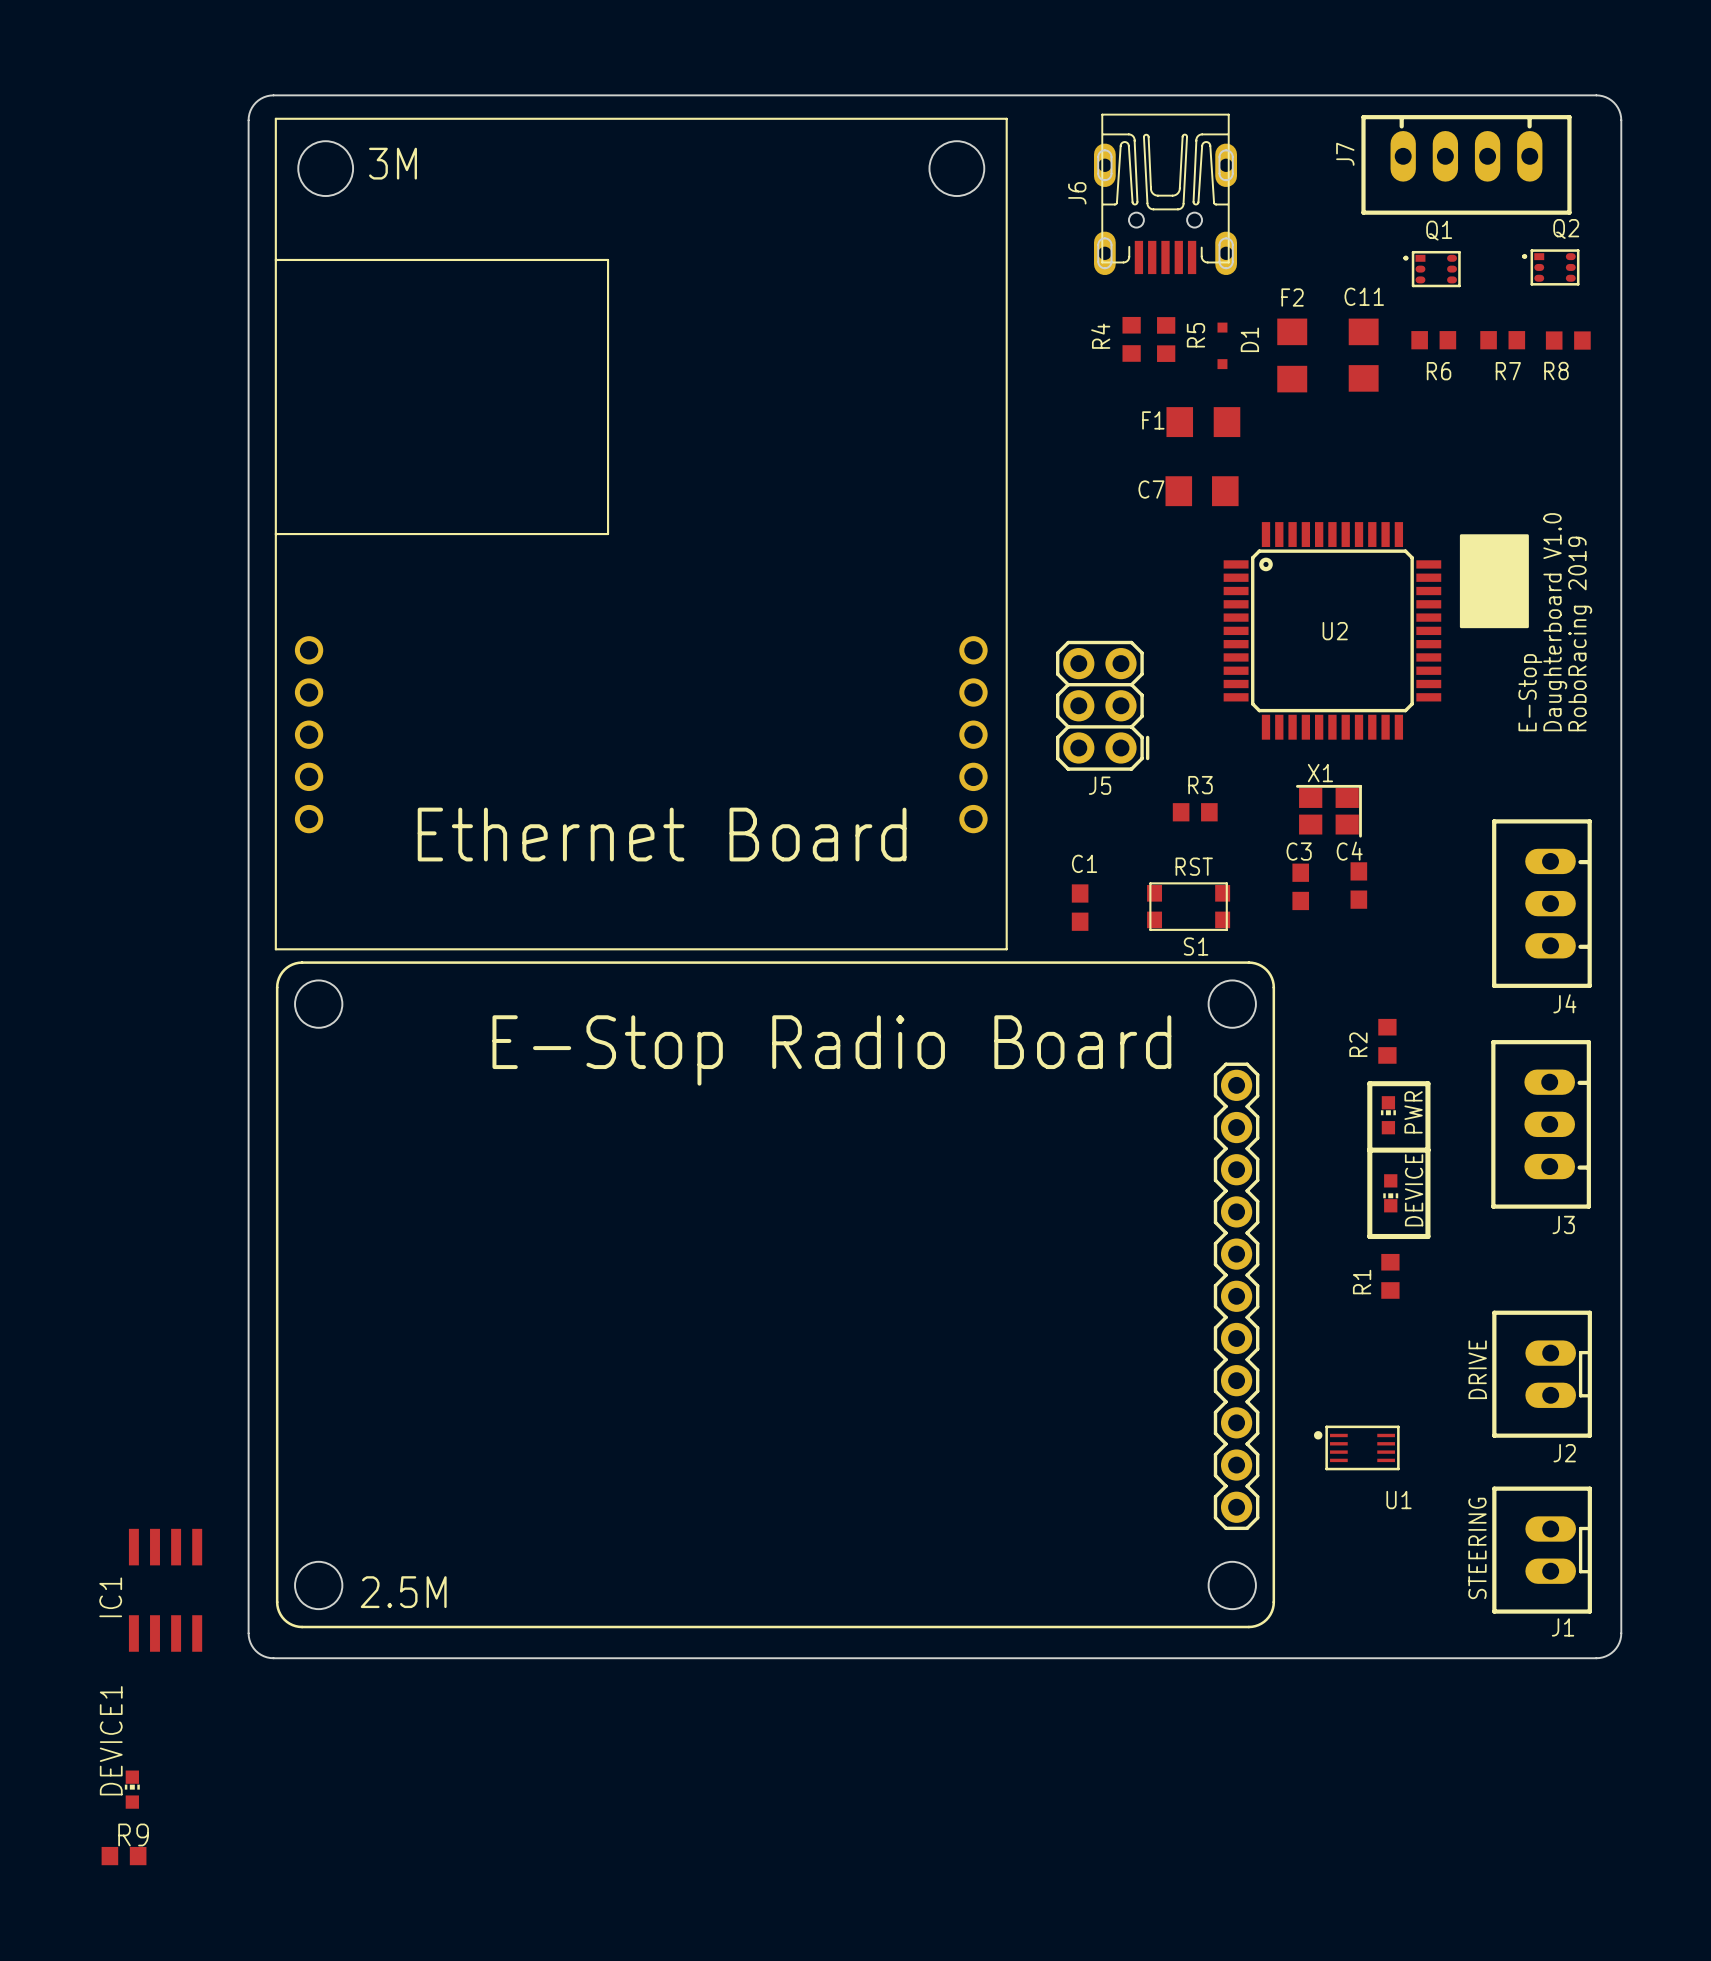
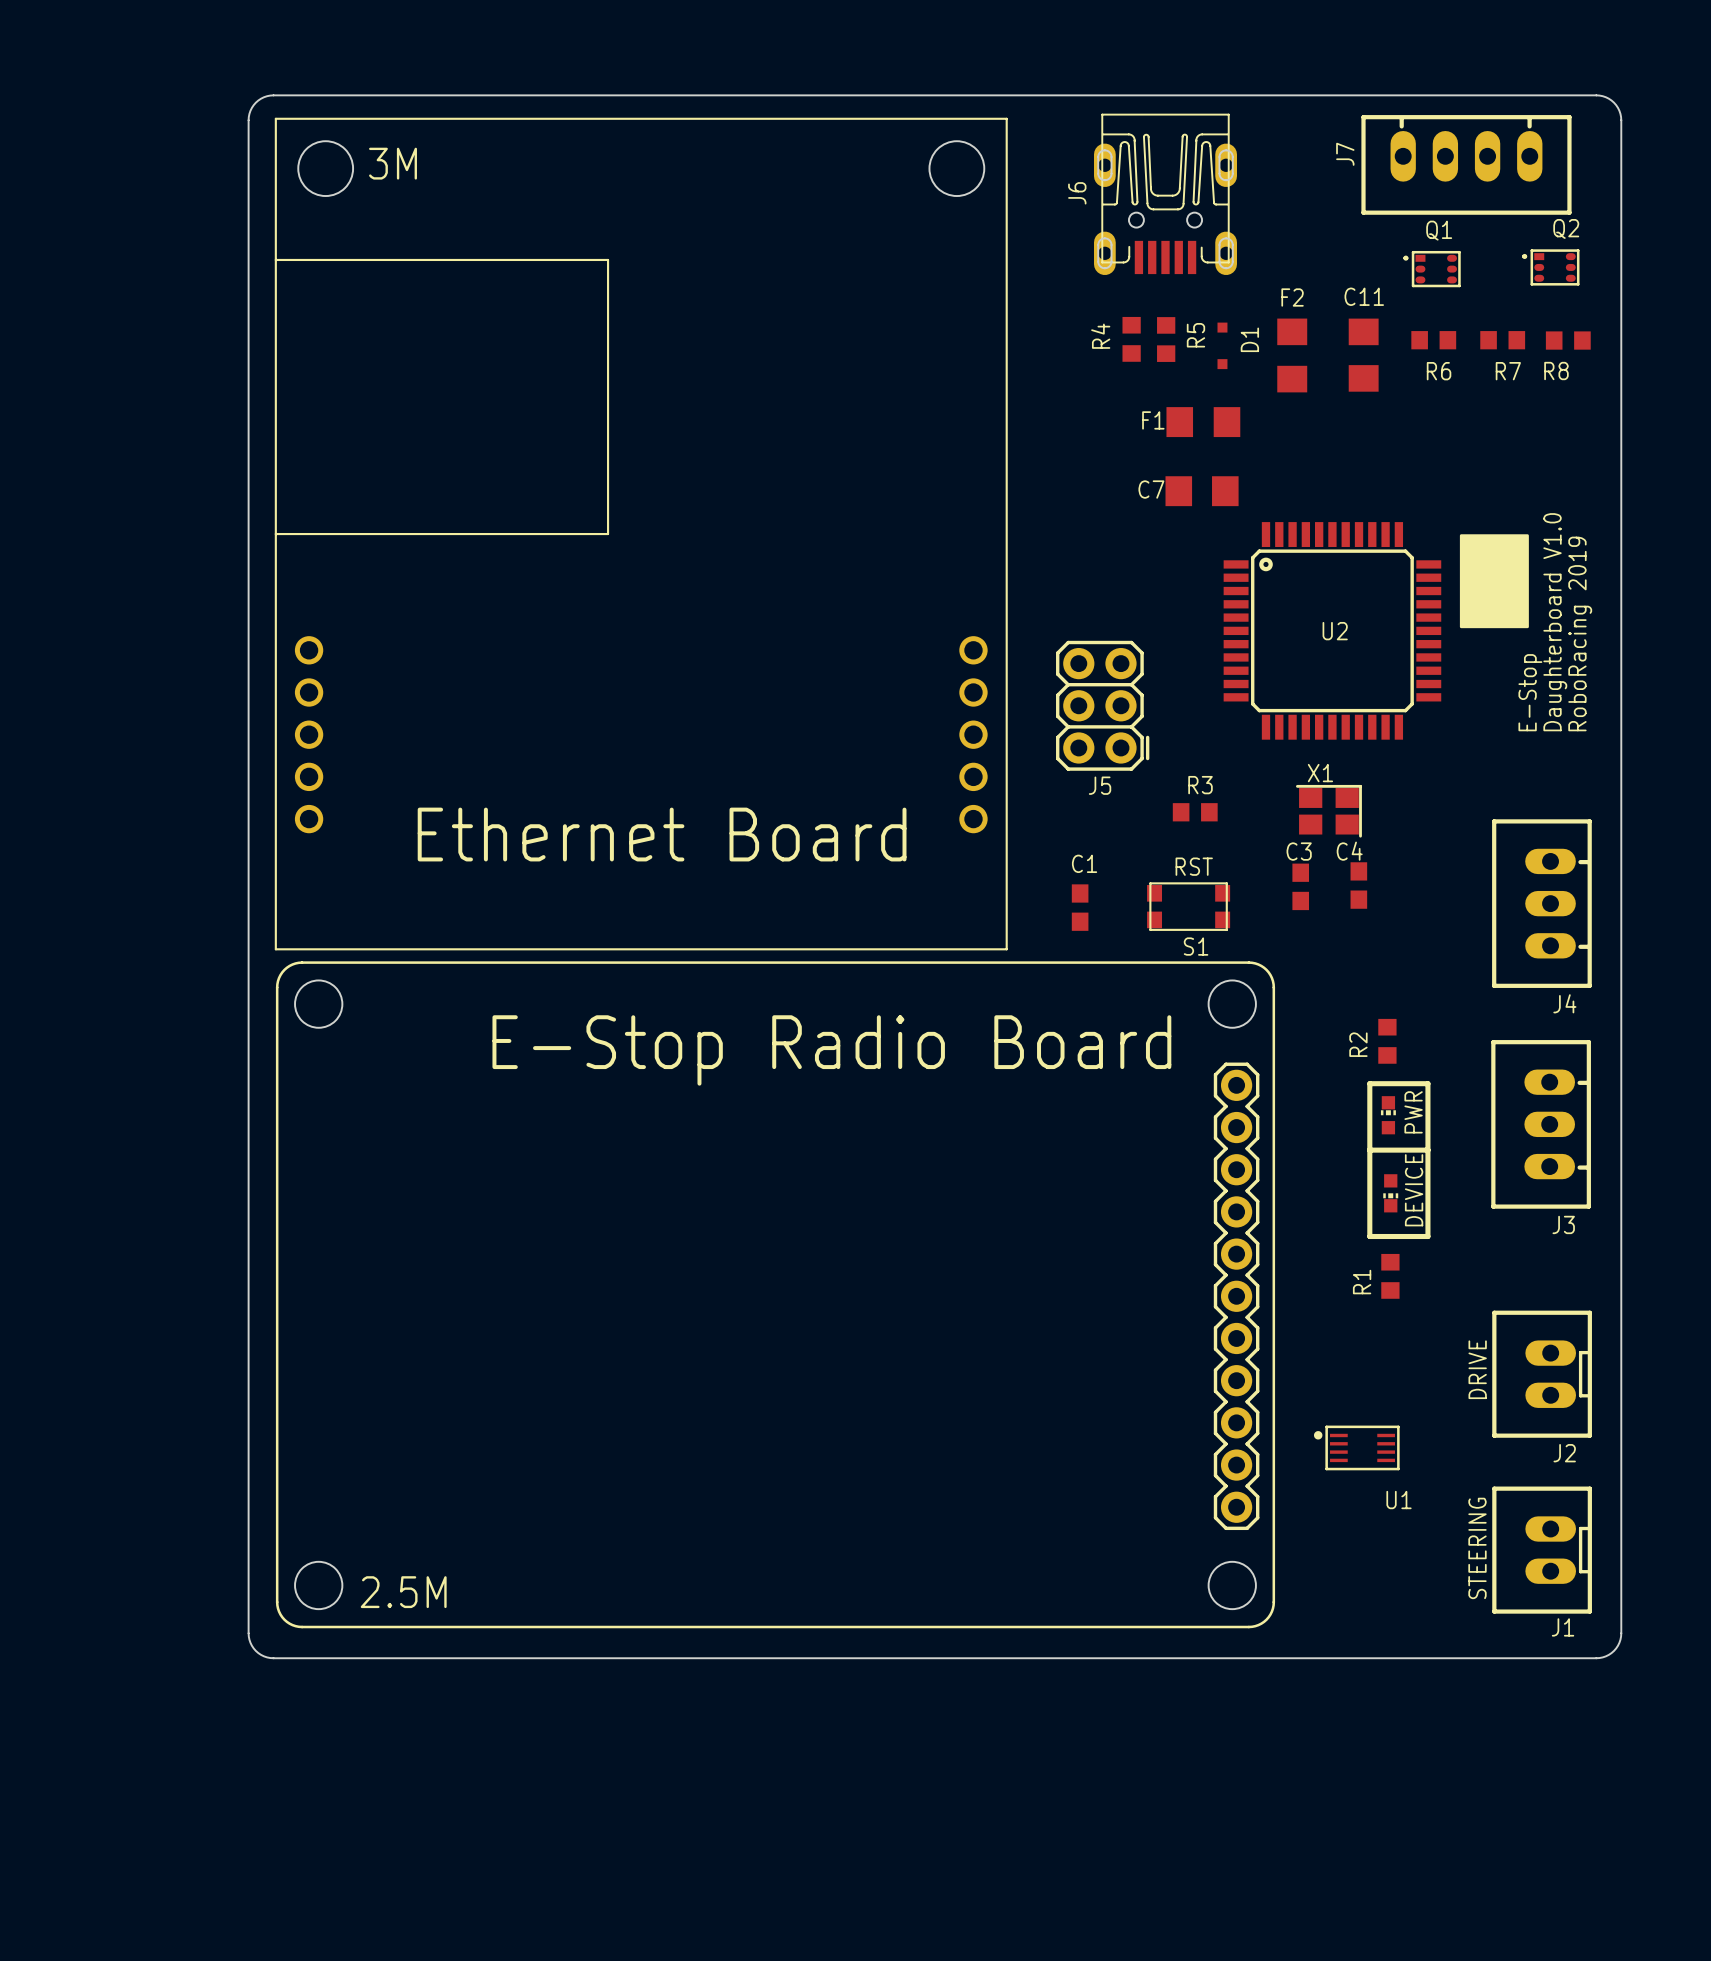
IC1: (165, 1590) -> none
DEVICE1: (132, 1789) -> none
R9: (124, 1856) -> none

